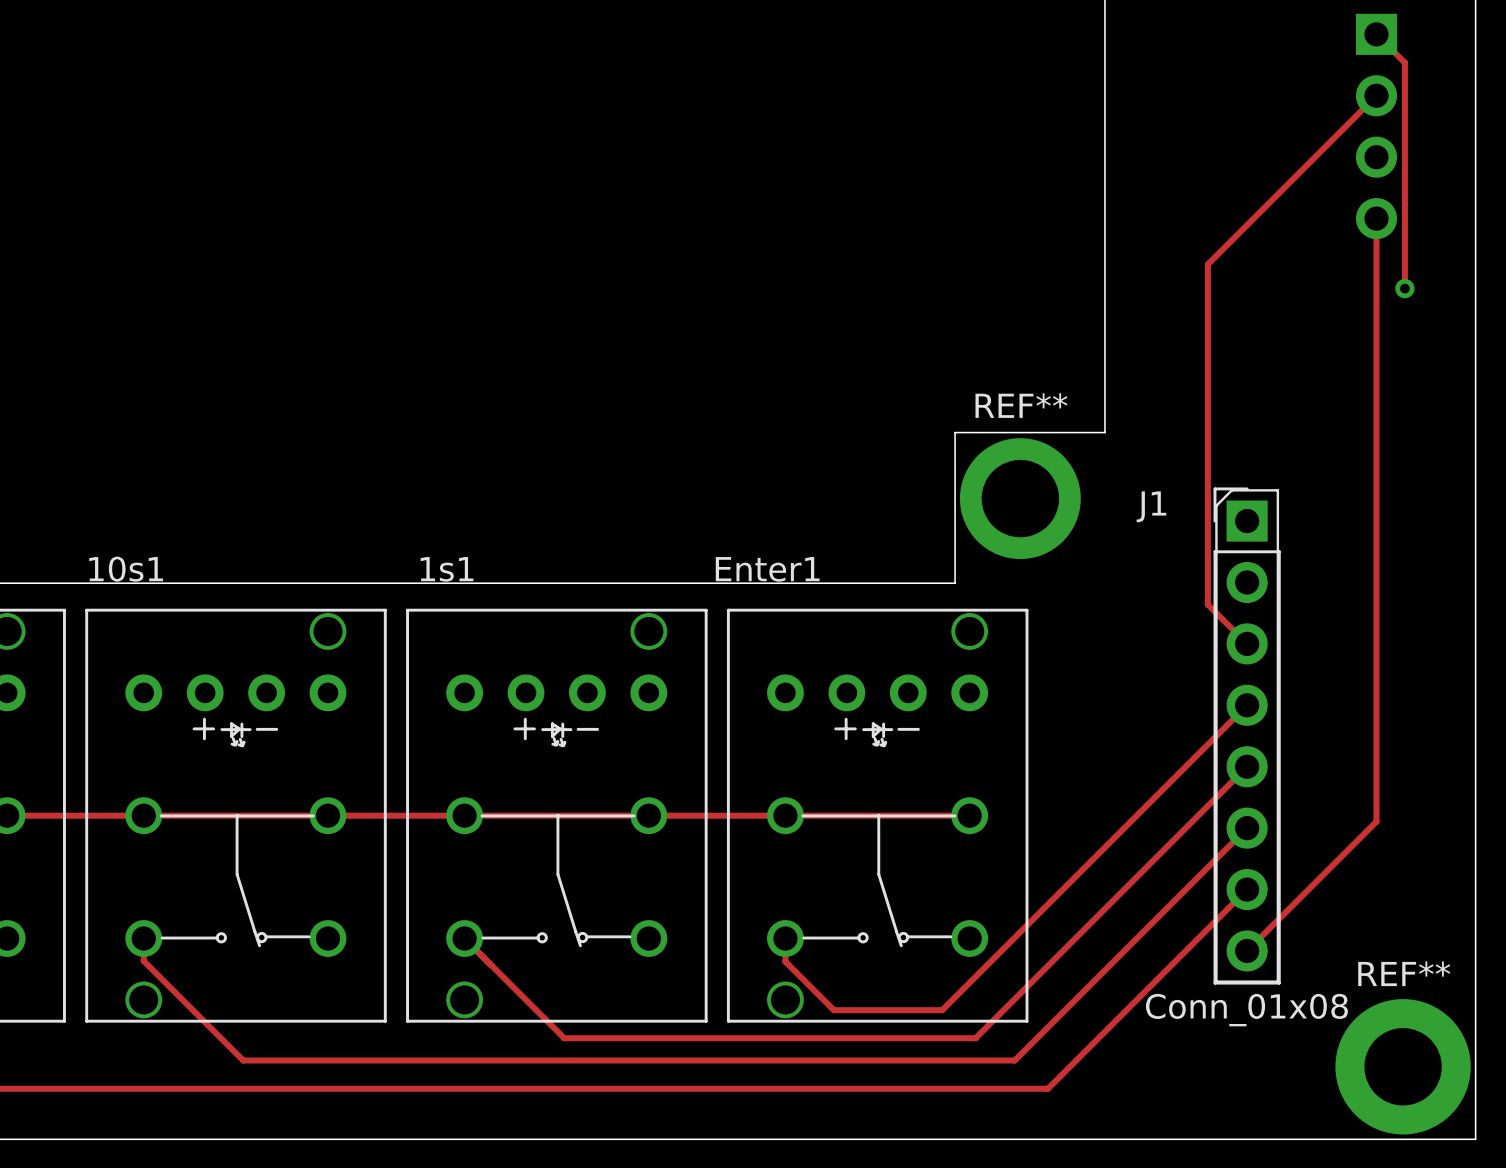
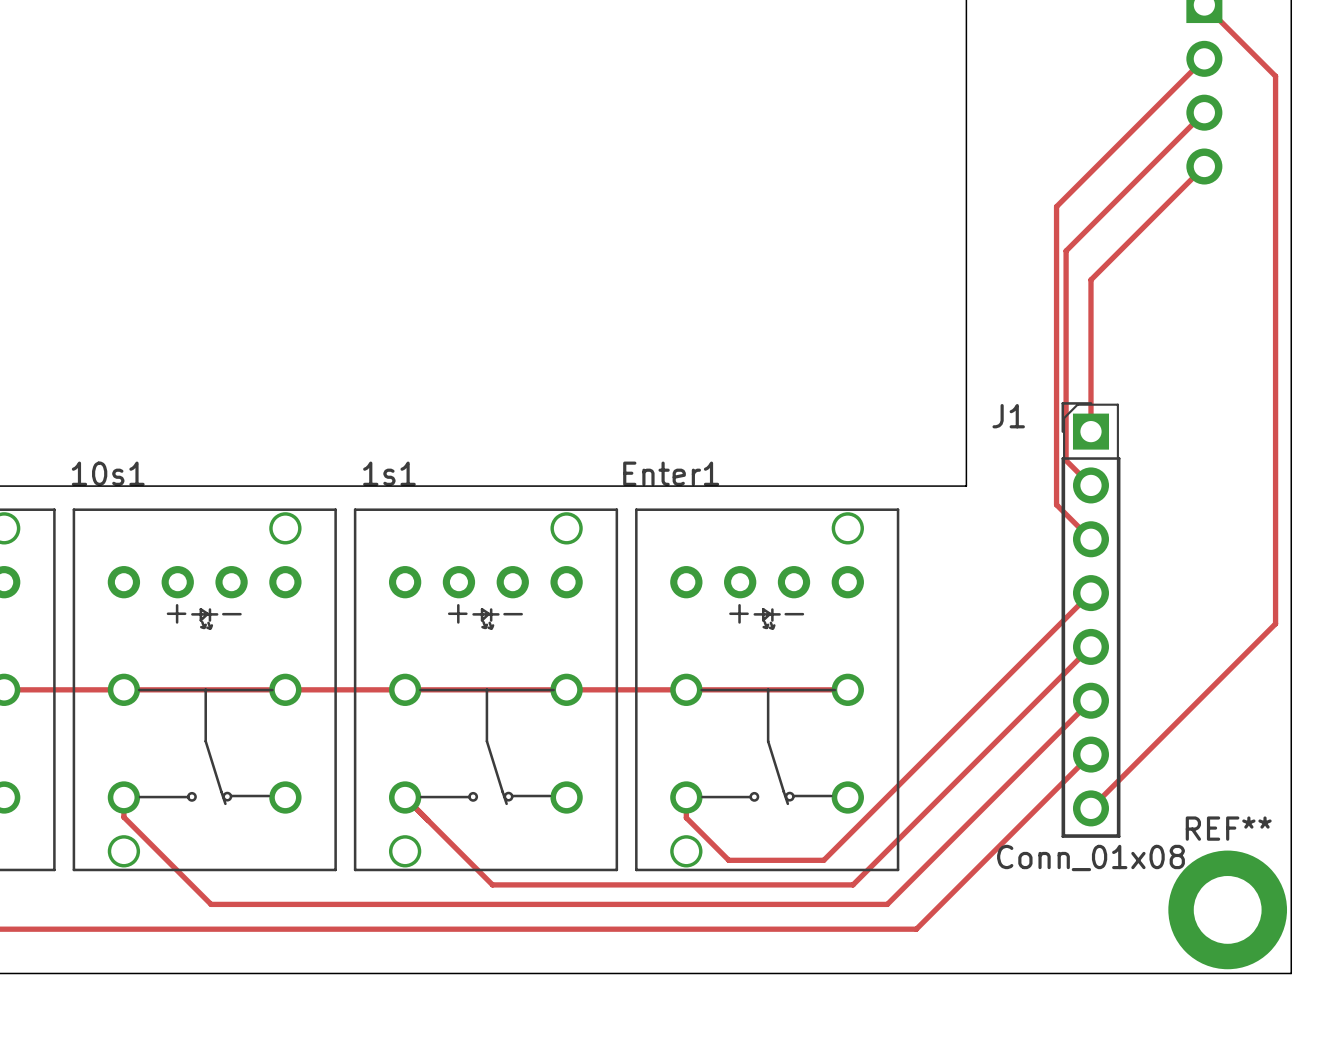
track: (1404, 62) (1404, 288) -> none
track: none -> (1204, 112) (1066, 250) (1066, 460) (1090, 485)
track: (1376, 218) (1376, 821) -> (1229, 29) (1275, 76) (1275, 623) (1204, 695)
track: none -> (1204, 166) (1090, 279) (1090, 431)
via: (1404, 288) -> none
board edge: (1104, 432) (955, 432) (955, 583) -> (966, 354) (966, 486) (835, 486)
REF**: (1020, 498) -> none

